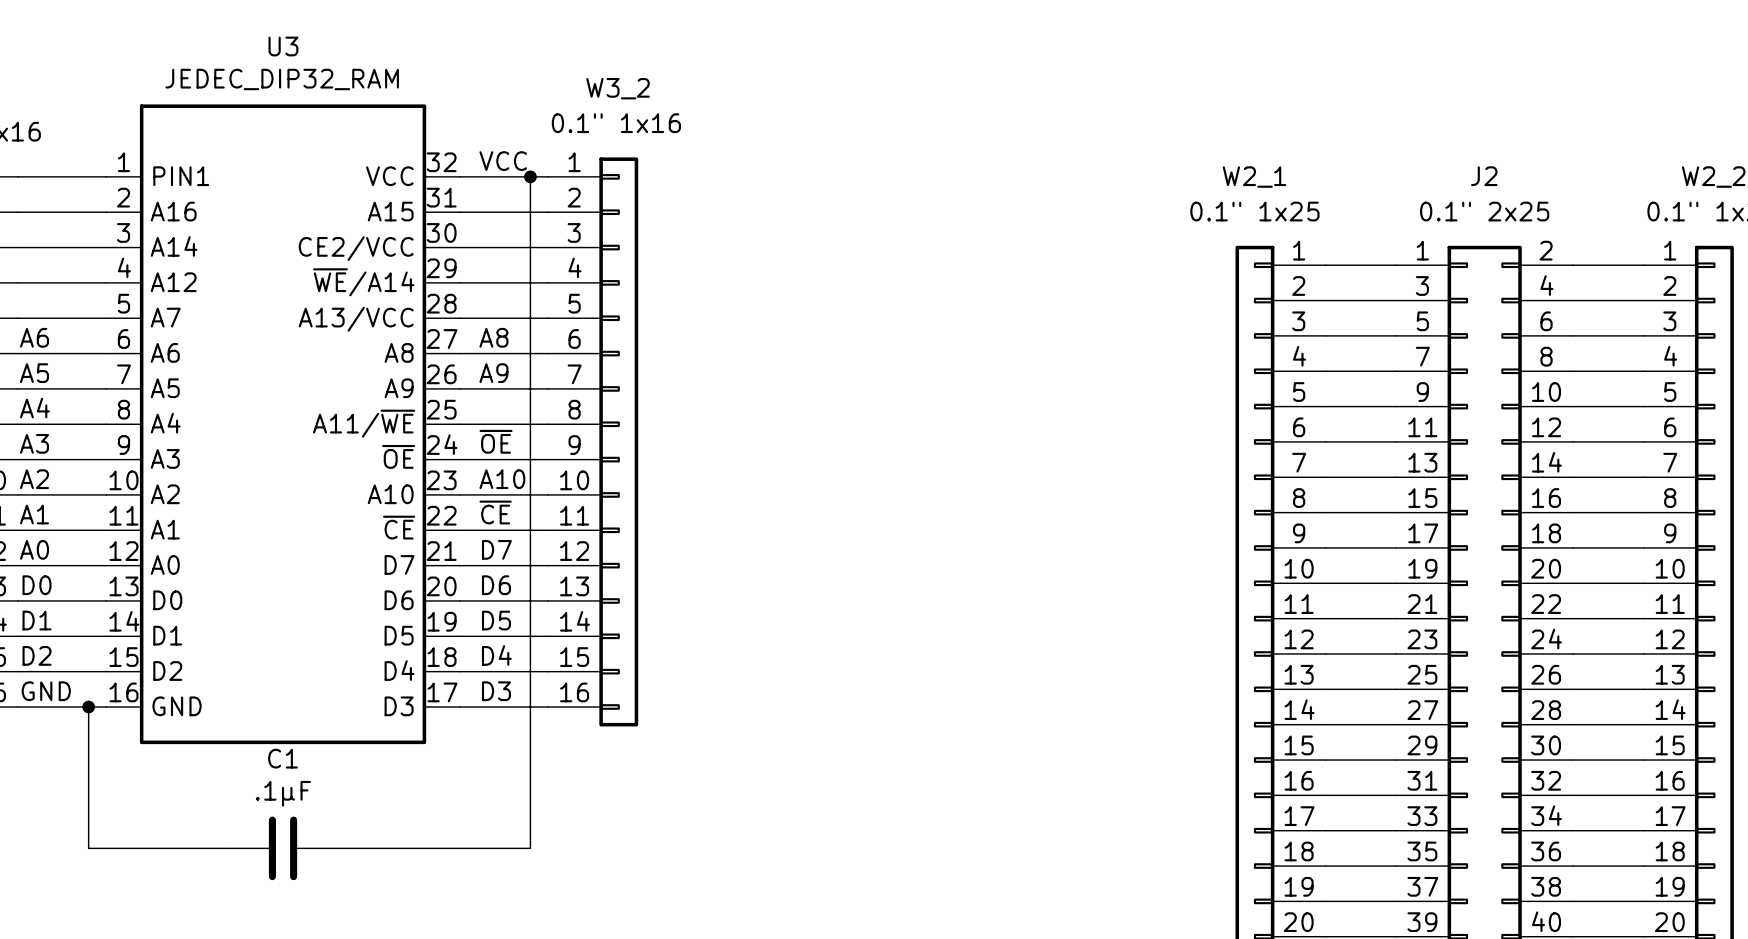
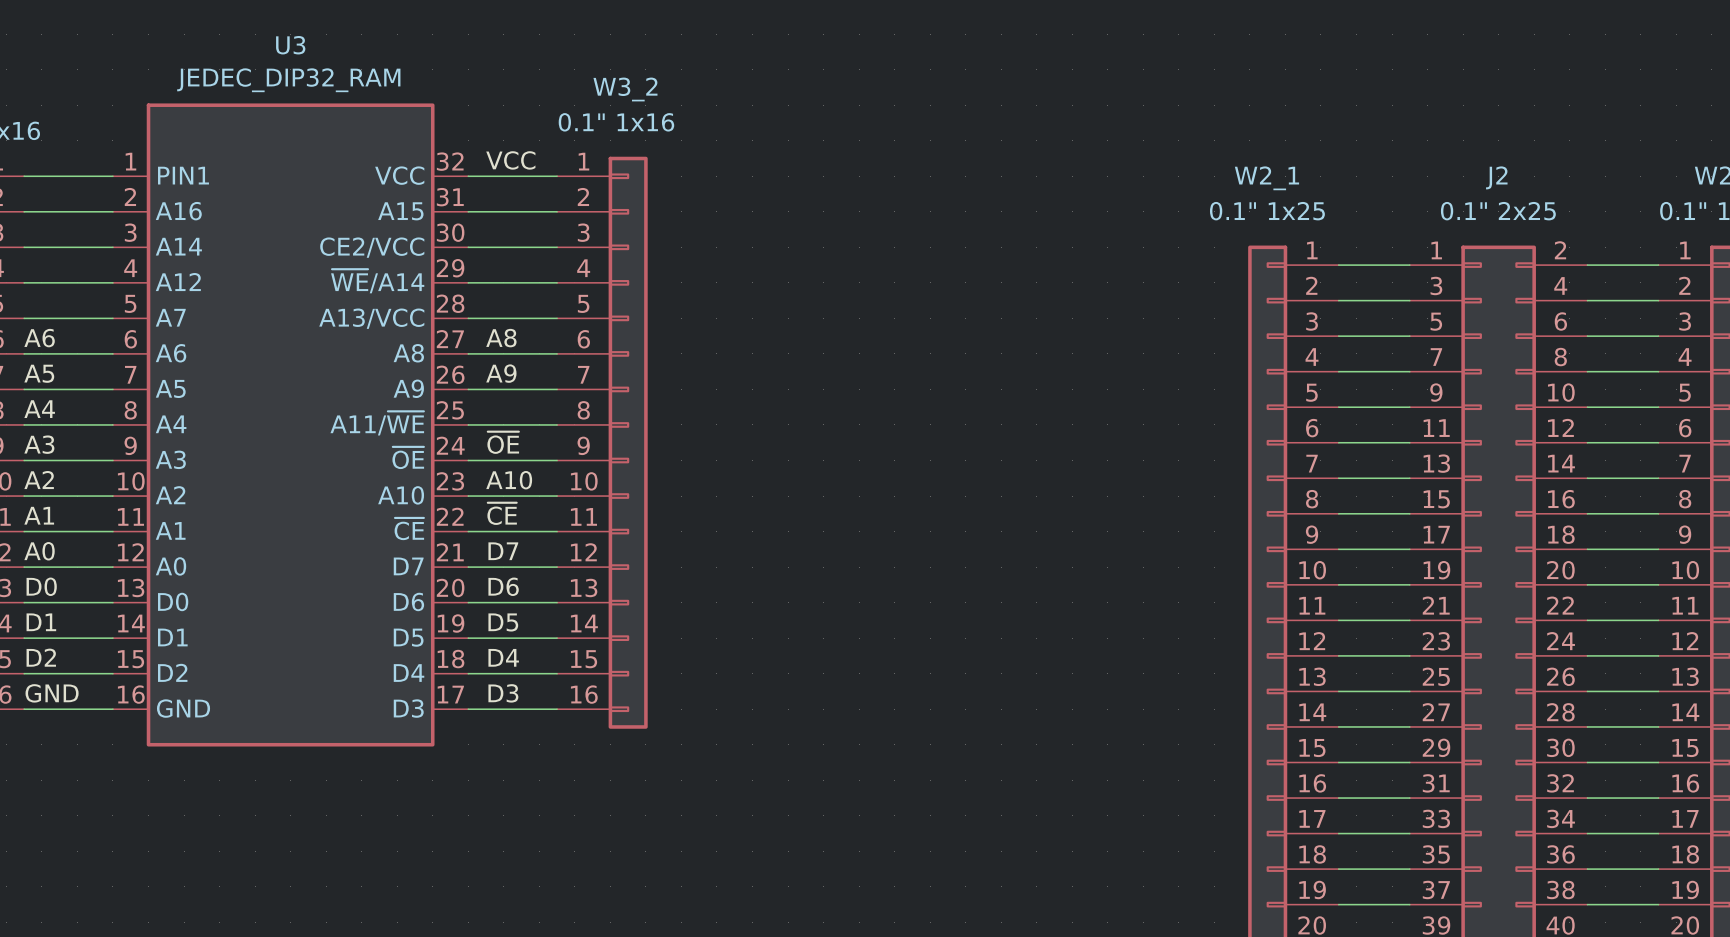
wire: (530, 176) (530, 848) (336, 848) -> none
junction: (530, 176) -> none
wire: (88, 707) (88, 848) (230, 848) -> none
junction: (88, 707) -> none
C1: .1μF (283, 848) -> none

